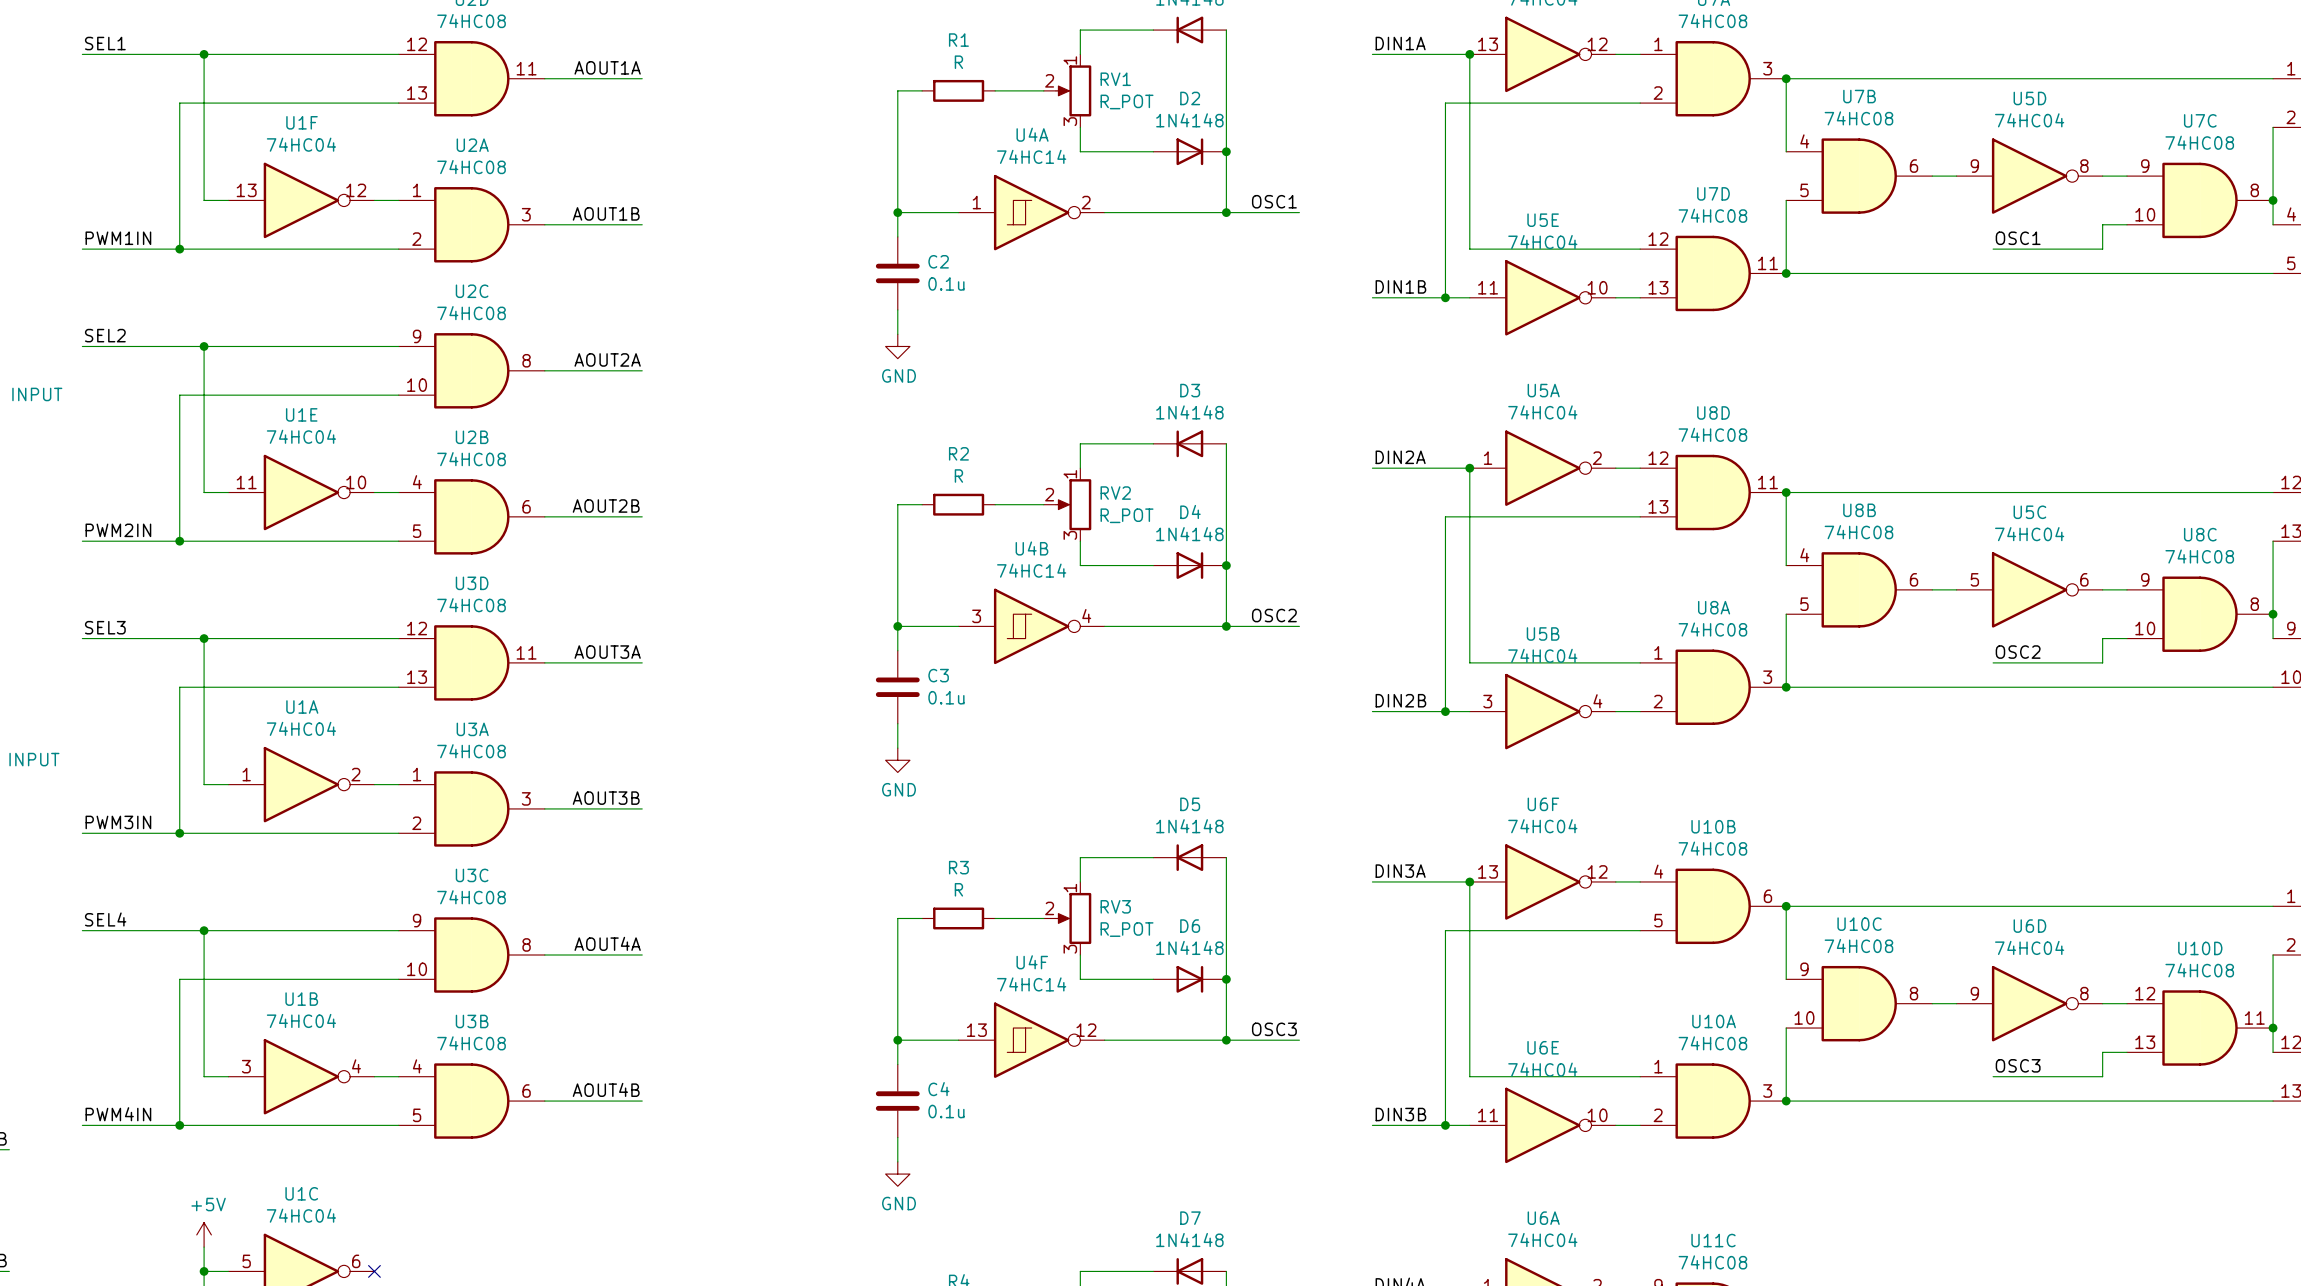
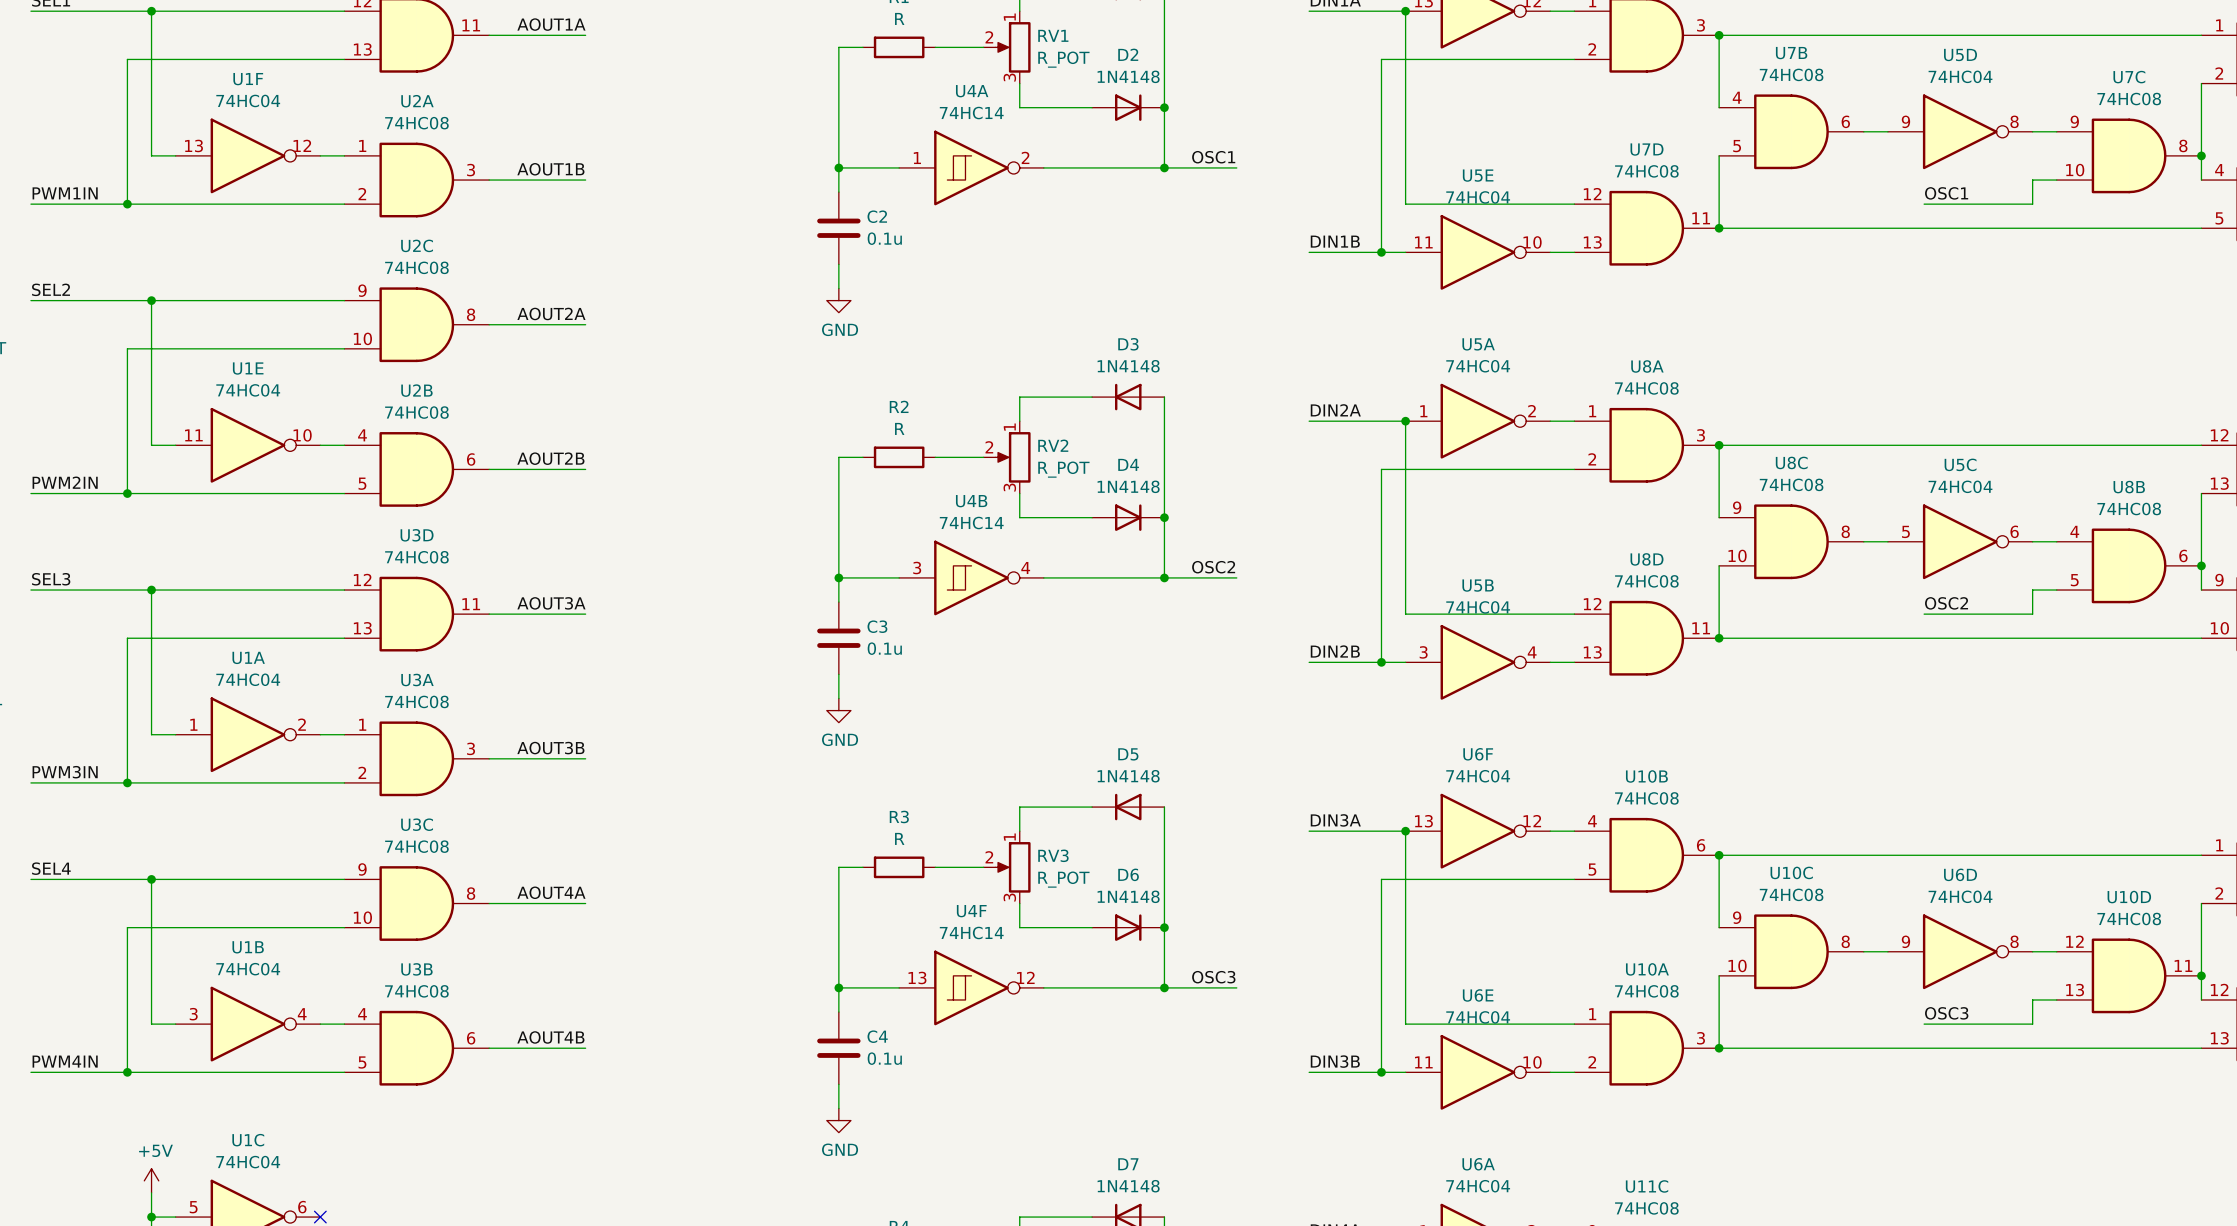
U8D position: (1713, 492) -> (1646, 638)
U8B position: (1859, 589) -> (2129, 565)
U8C position: (2200, 614) -> (1791, 541)
U8A position: (1713, 687) -> (1646, 445)

